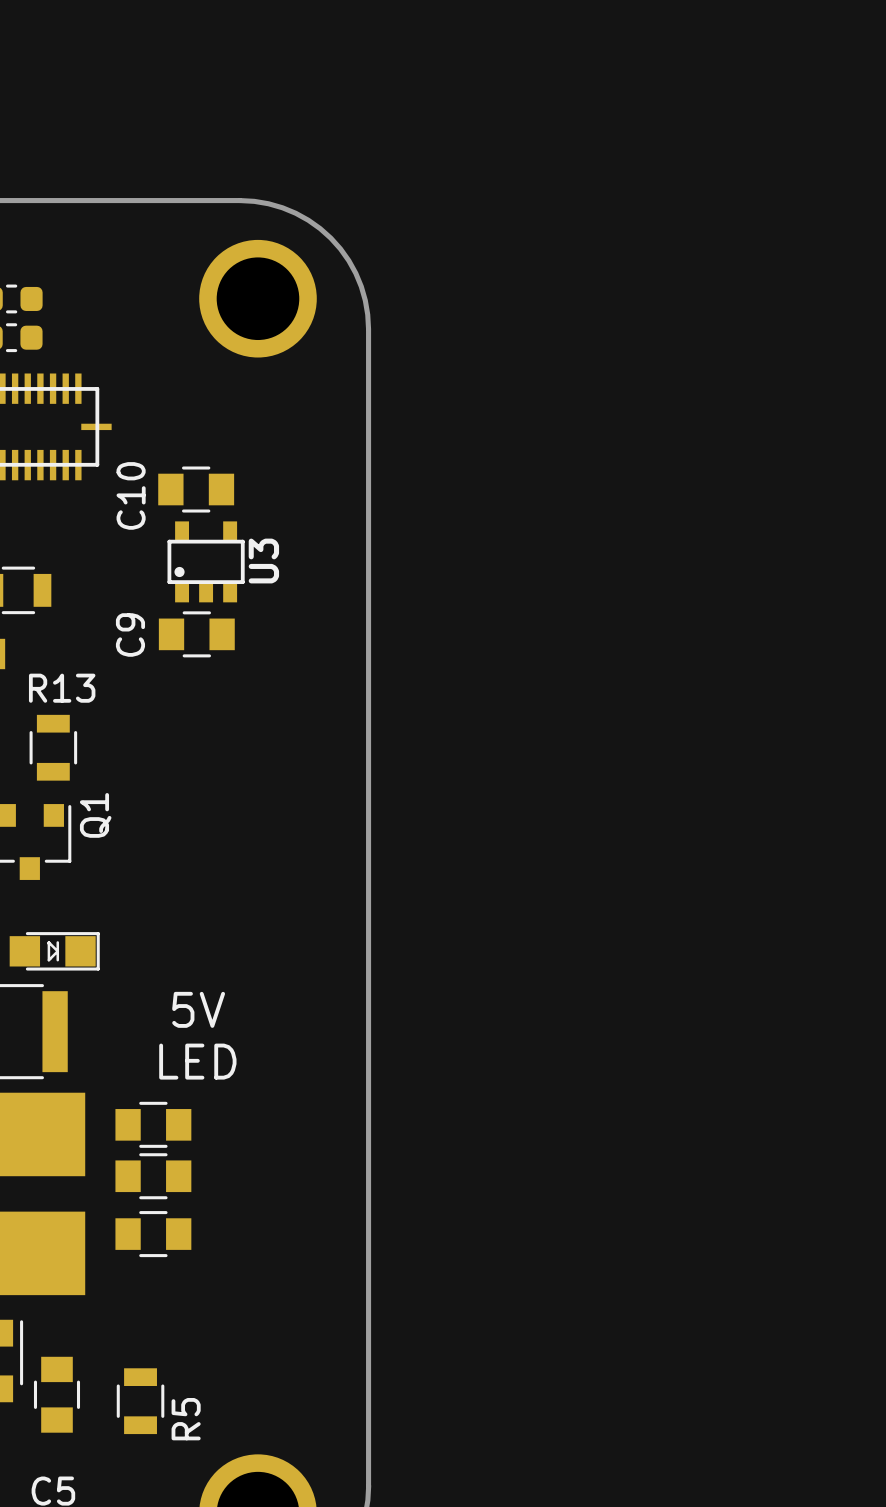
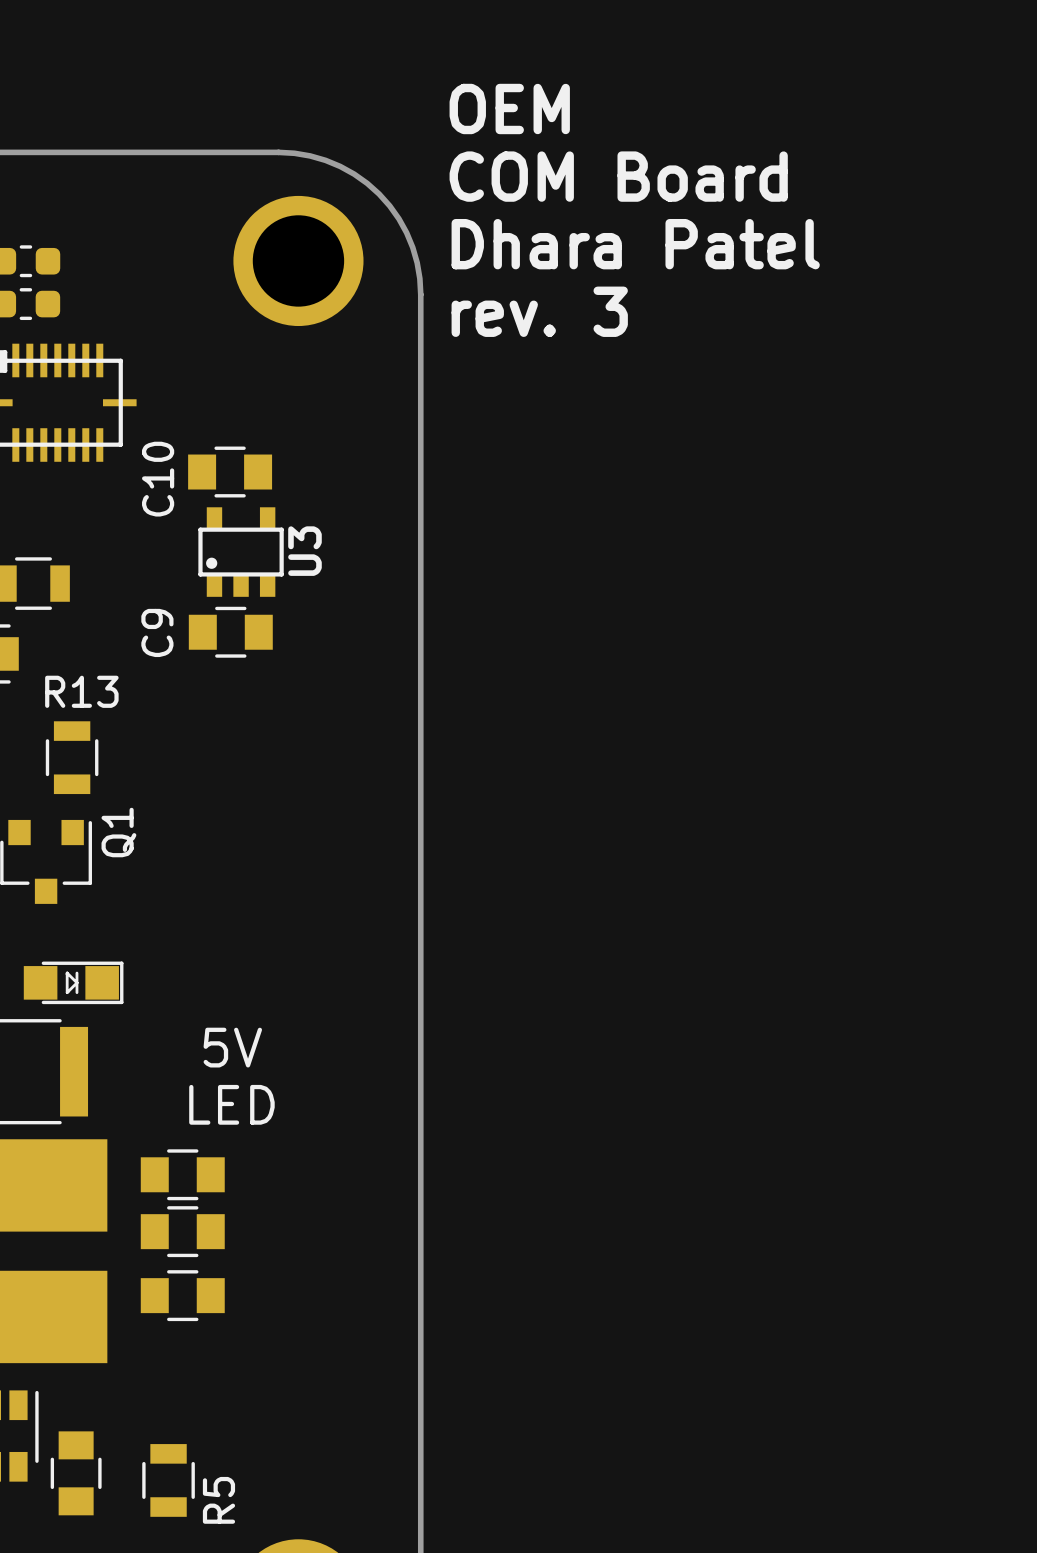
text: none -> OEM (509, 109)
text: none -> COM Board (618, 176)
text: none -> Dhara Patel (635, 244)
text: none -> rev. 3 (539, 311)

